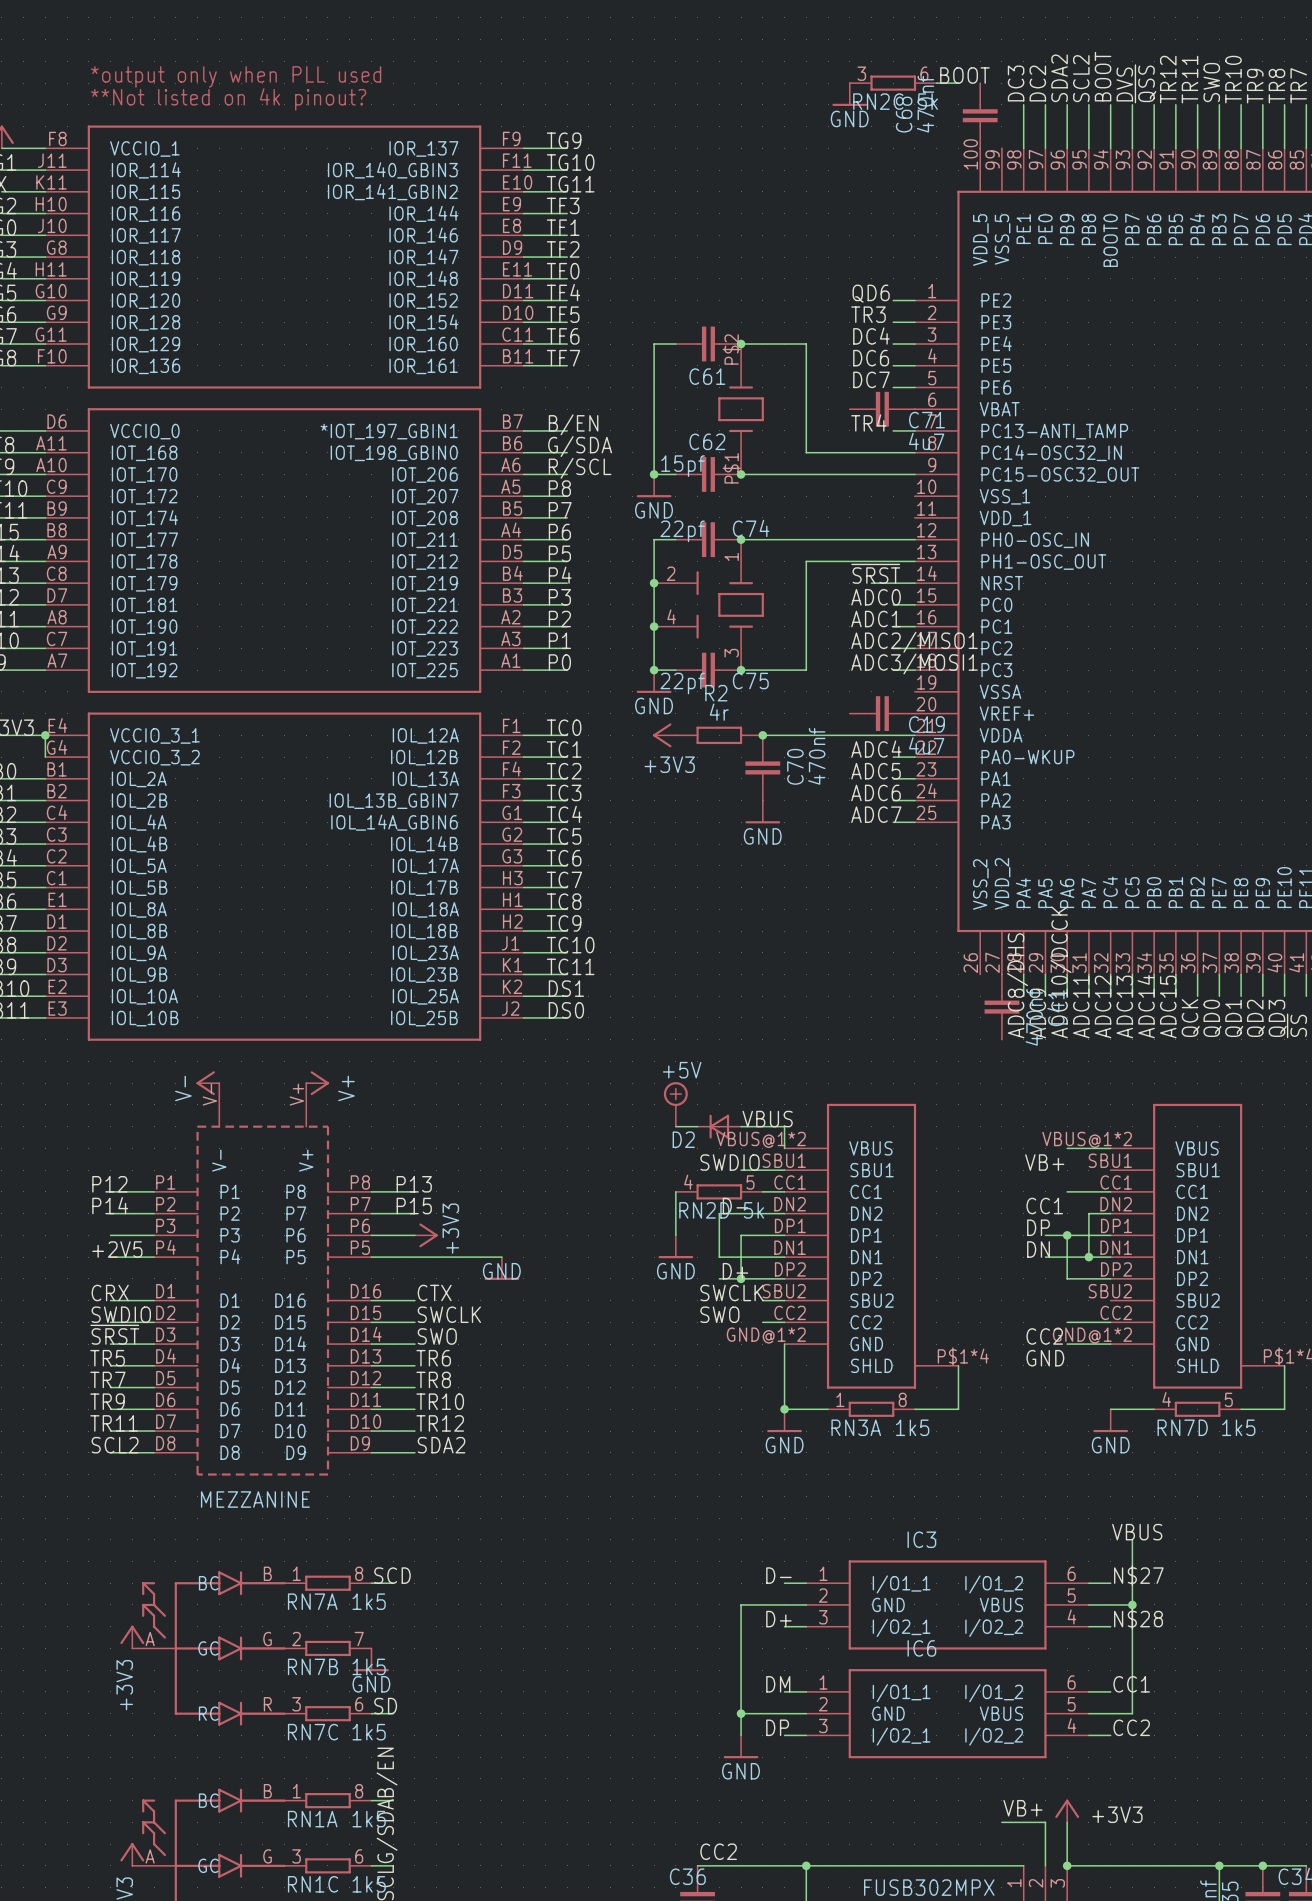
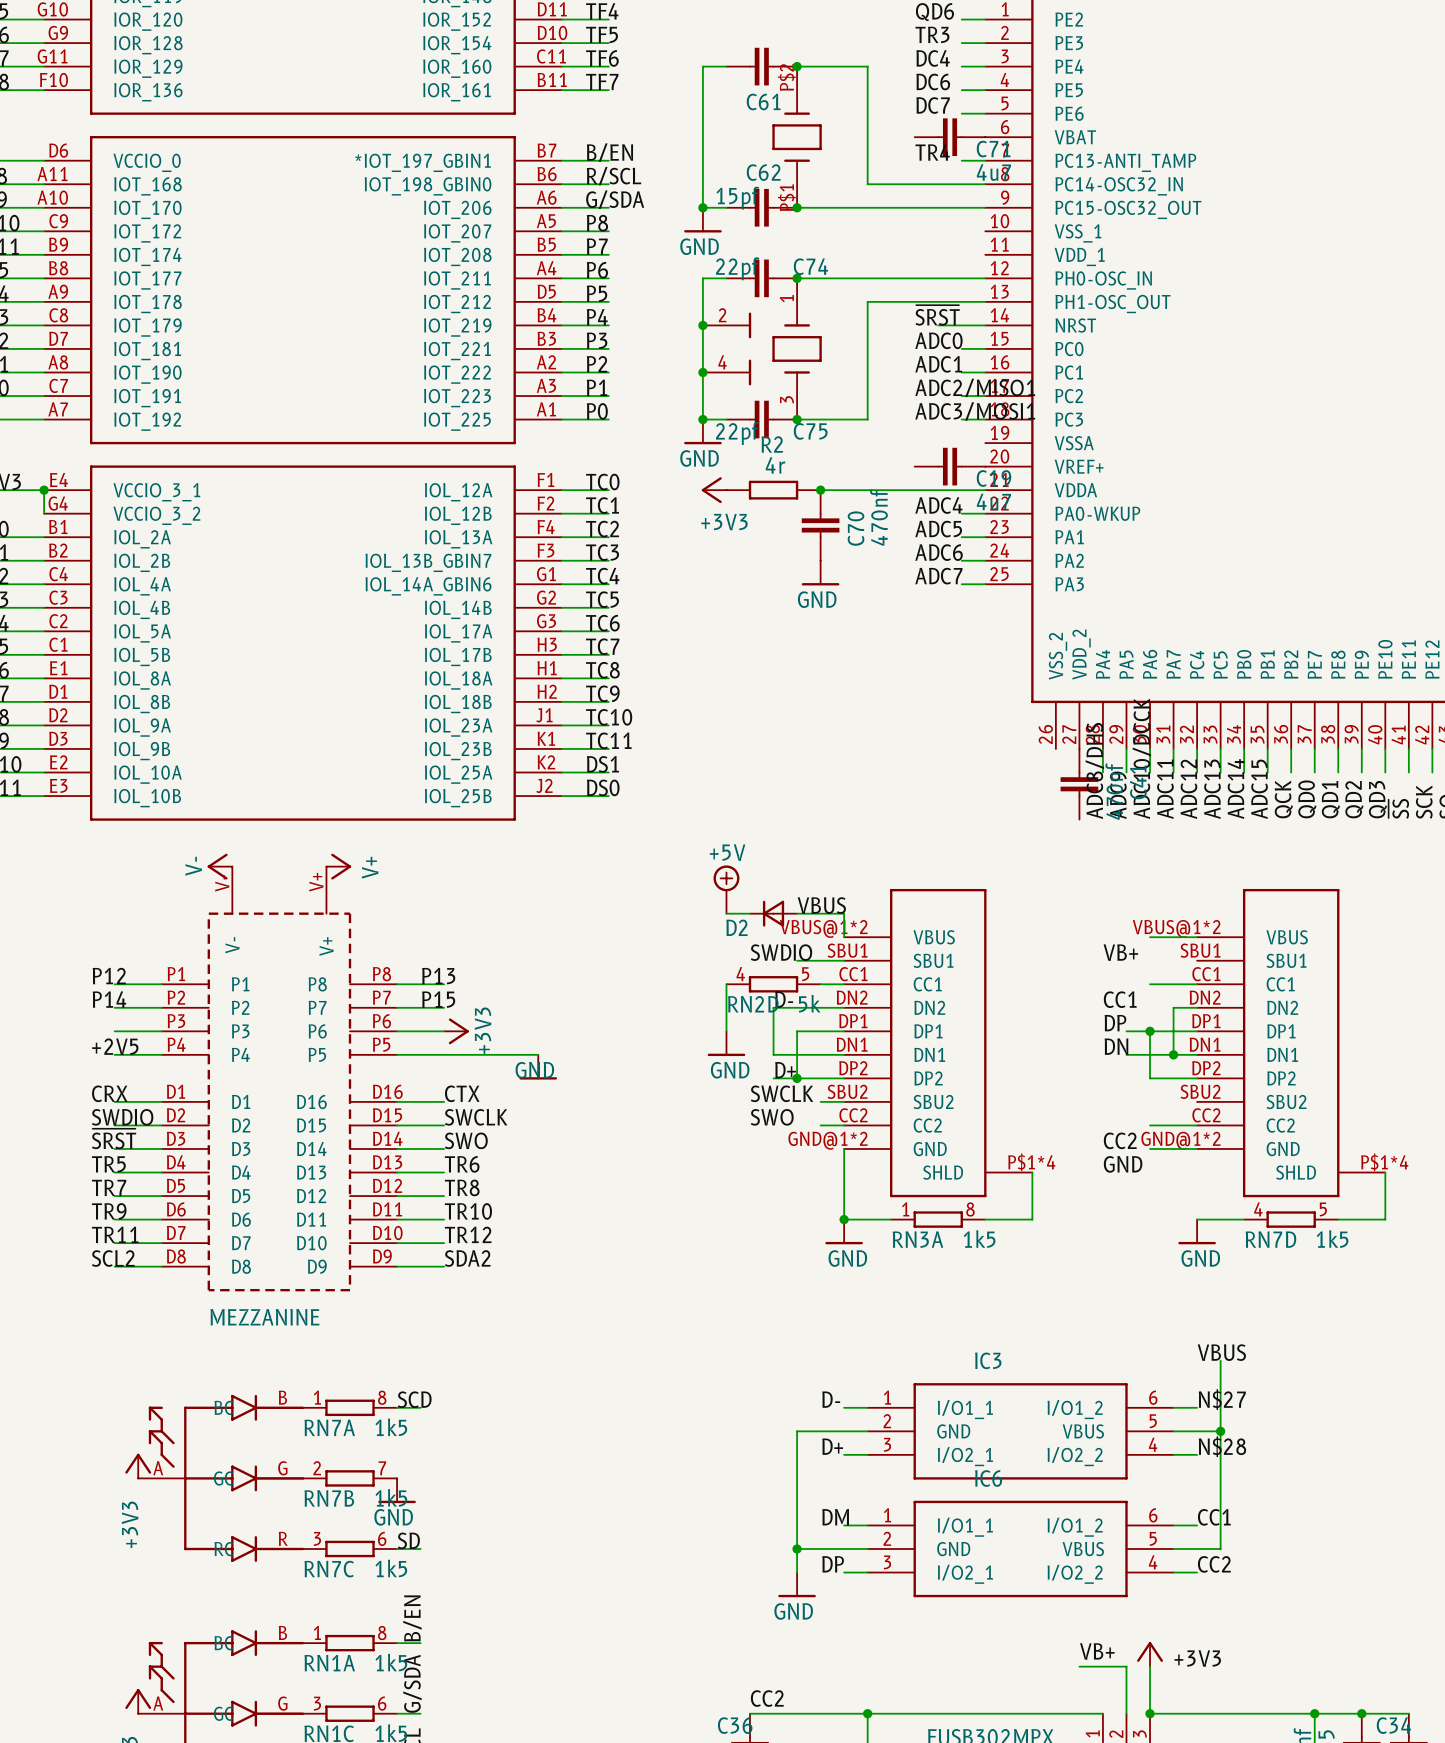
label: G/SDA (580, 446) -> R/SCL (614, 176)
label: R/SCL (580, 468) -> G/SDA (615, 199)

